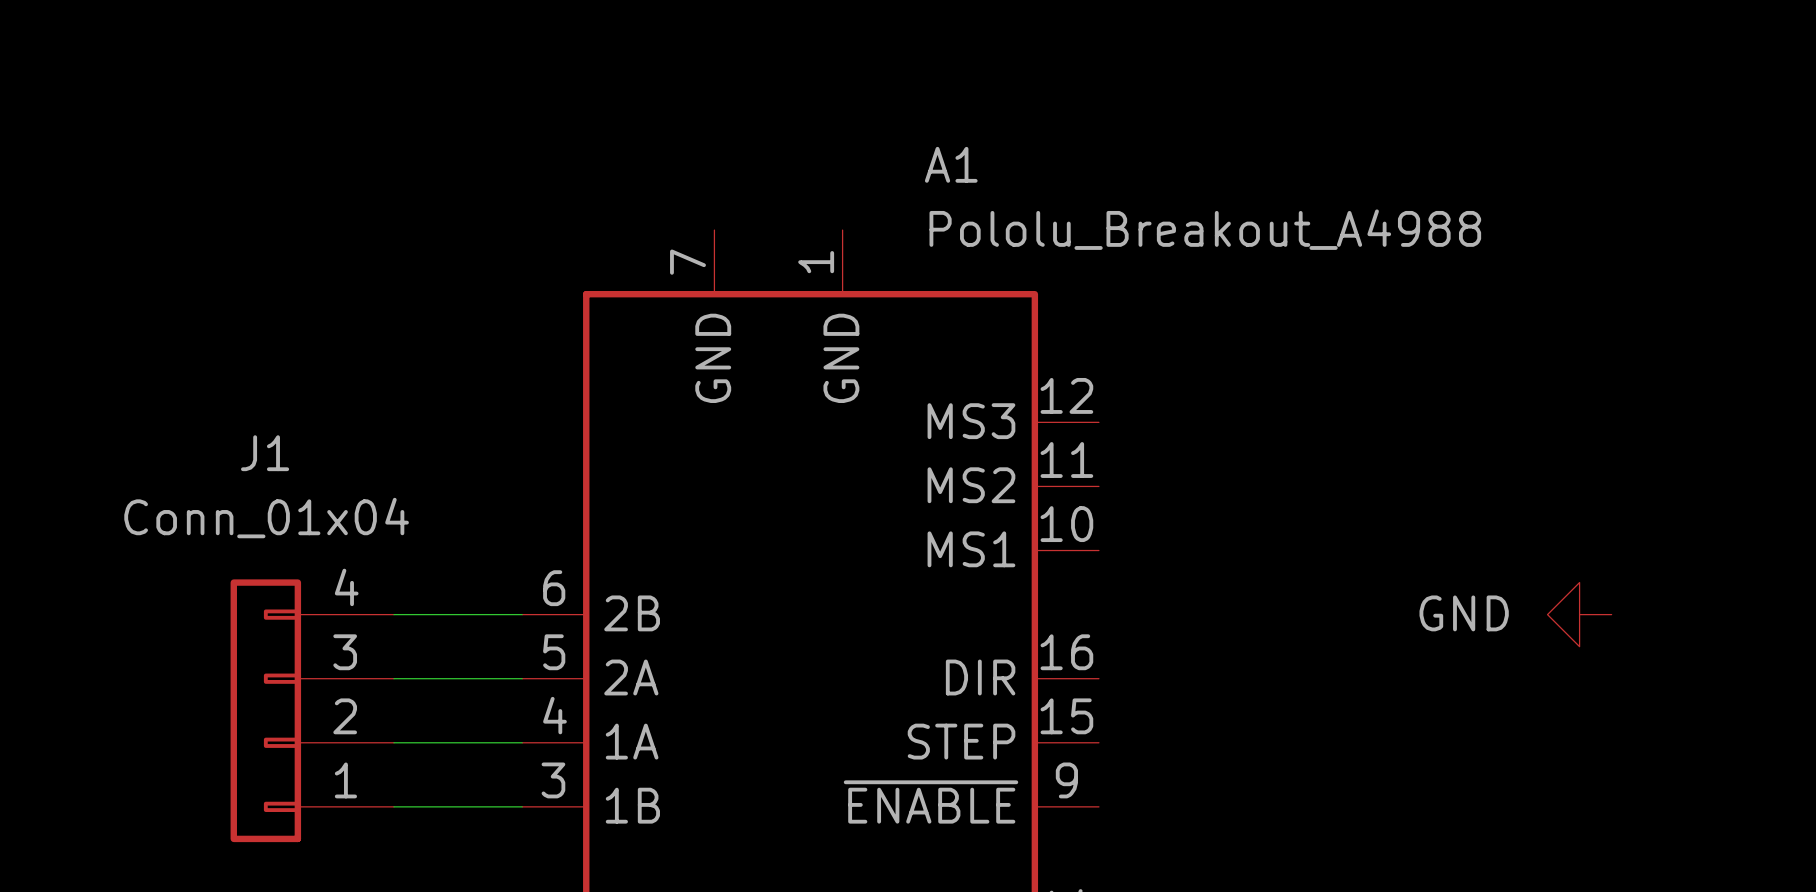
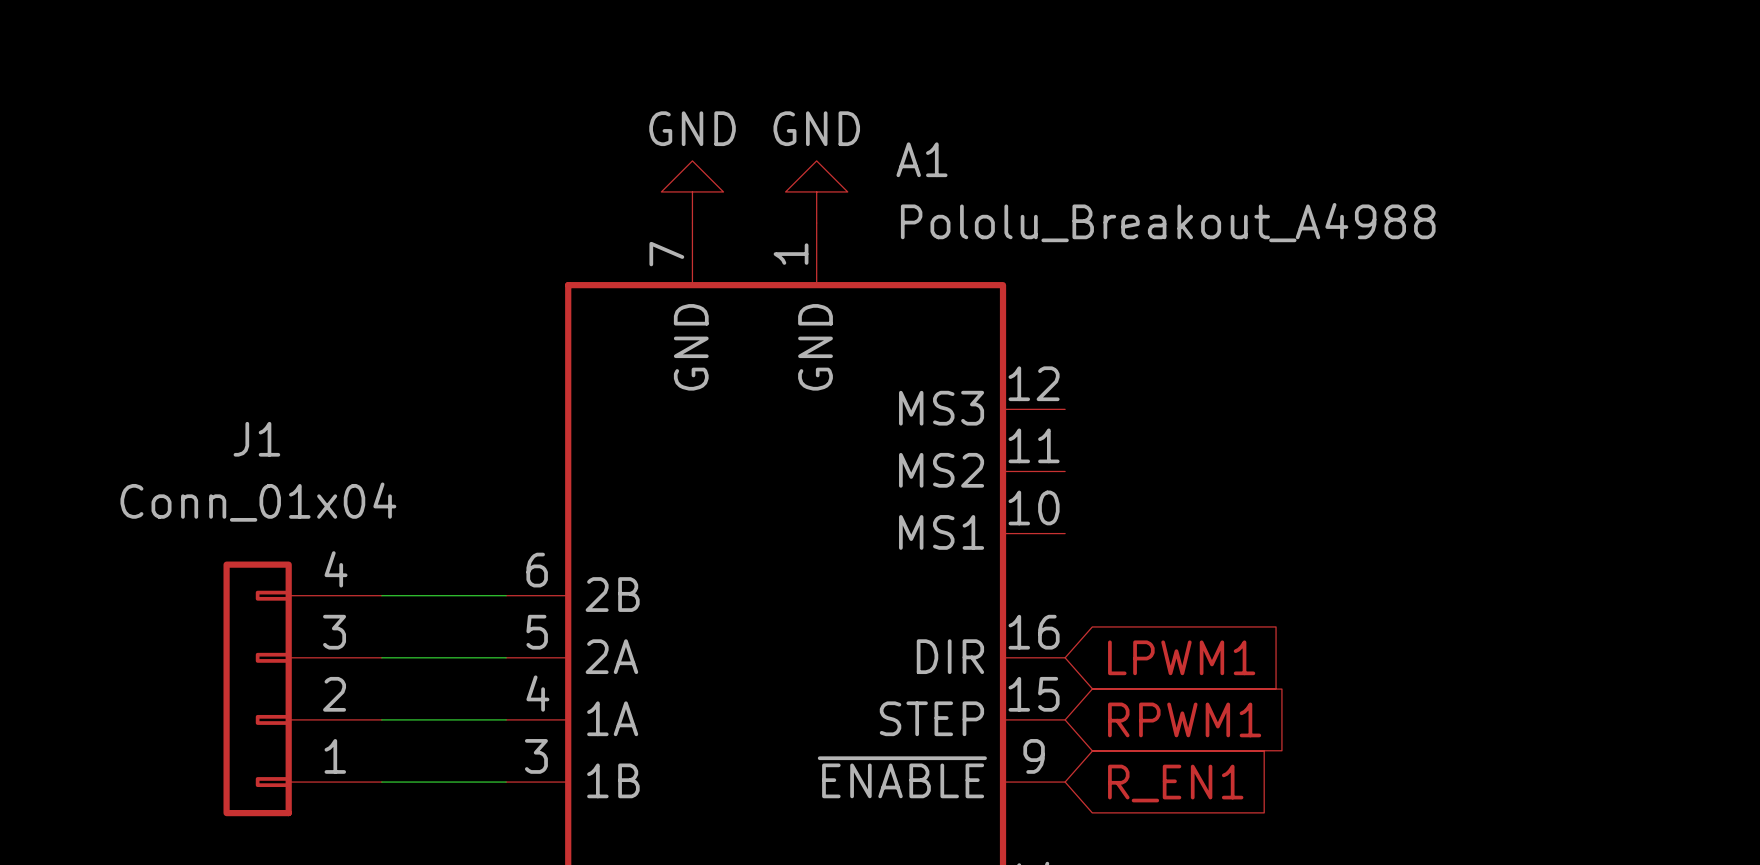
power symbol: none -> GND (692, 191)
power symbol: none -> GND (816, 191)
power symbol: GND (1579, 614) -> none
global label: none -> LPWM1 (1181, 657)
global label: none -> RPWM1 (1184, 719)
global label: none -> R_EN1 (1175, 783)

